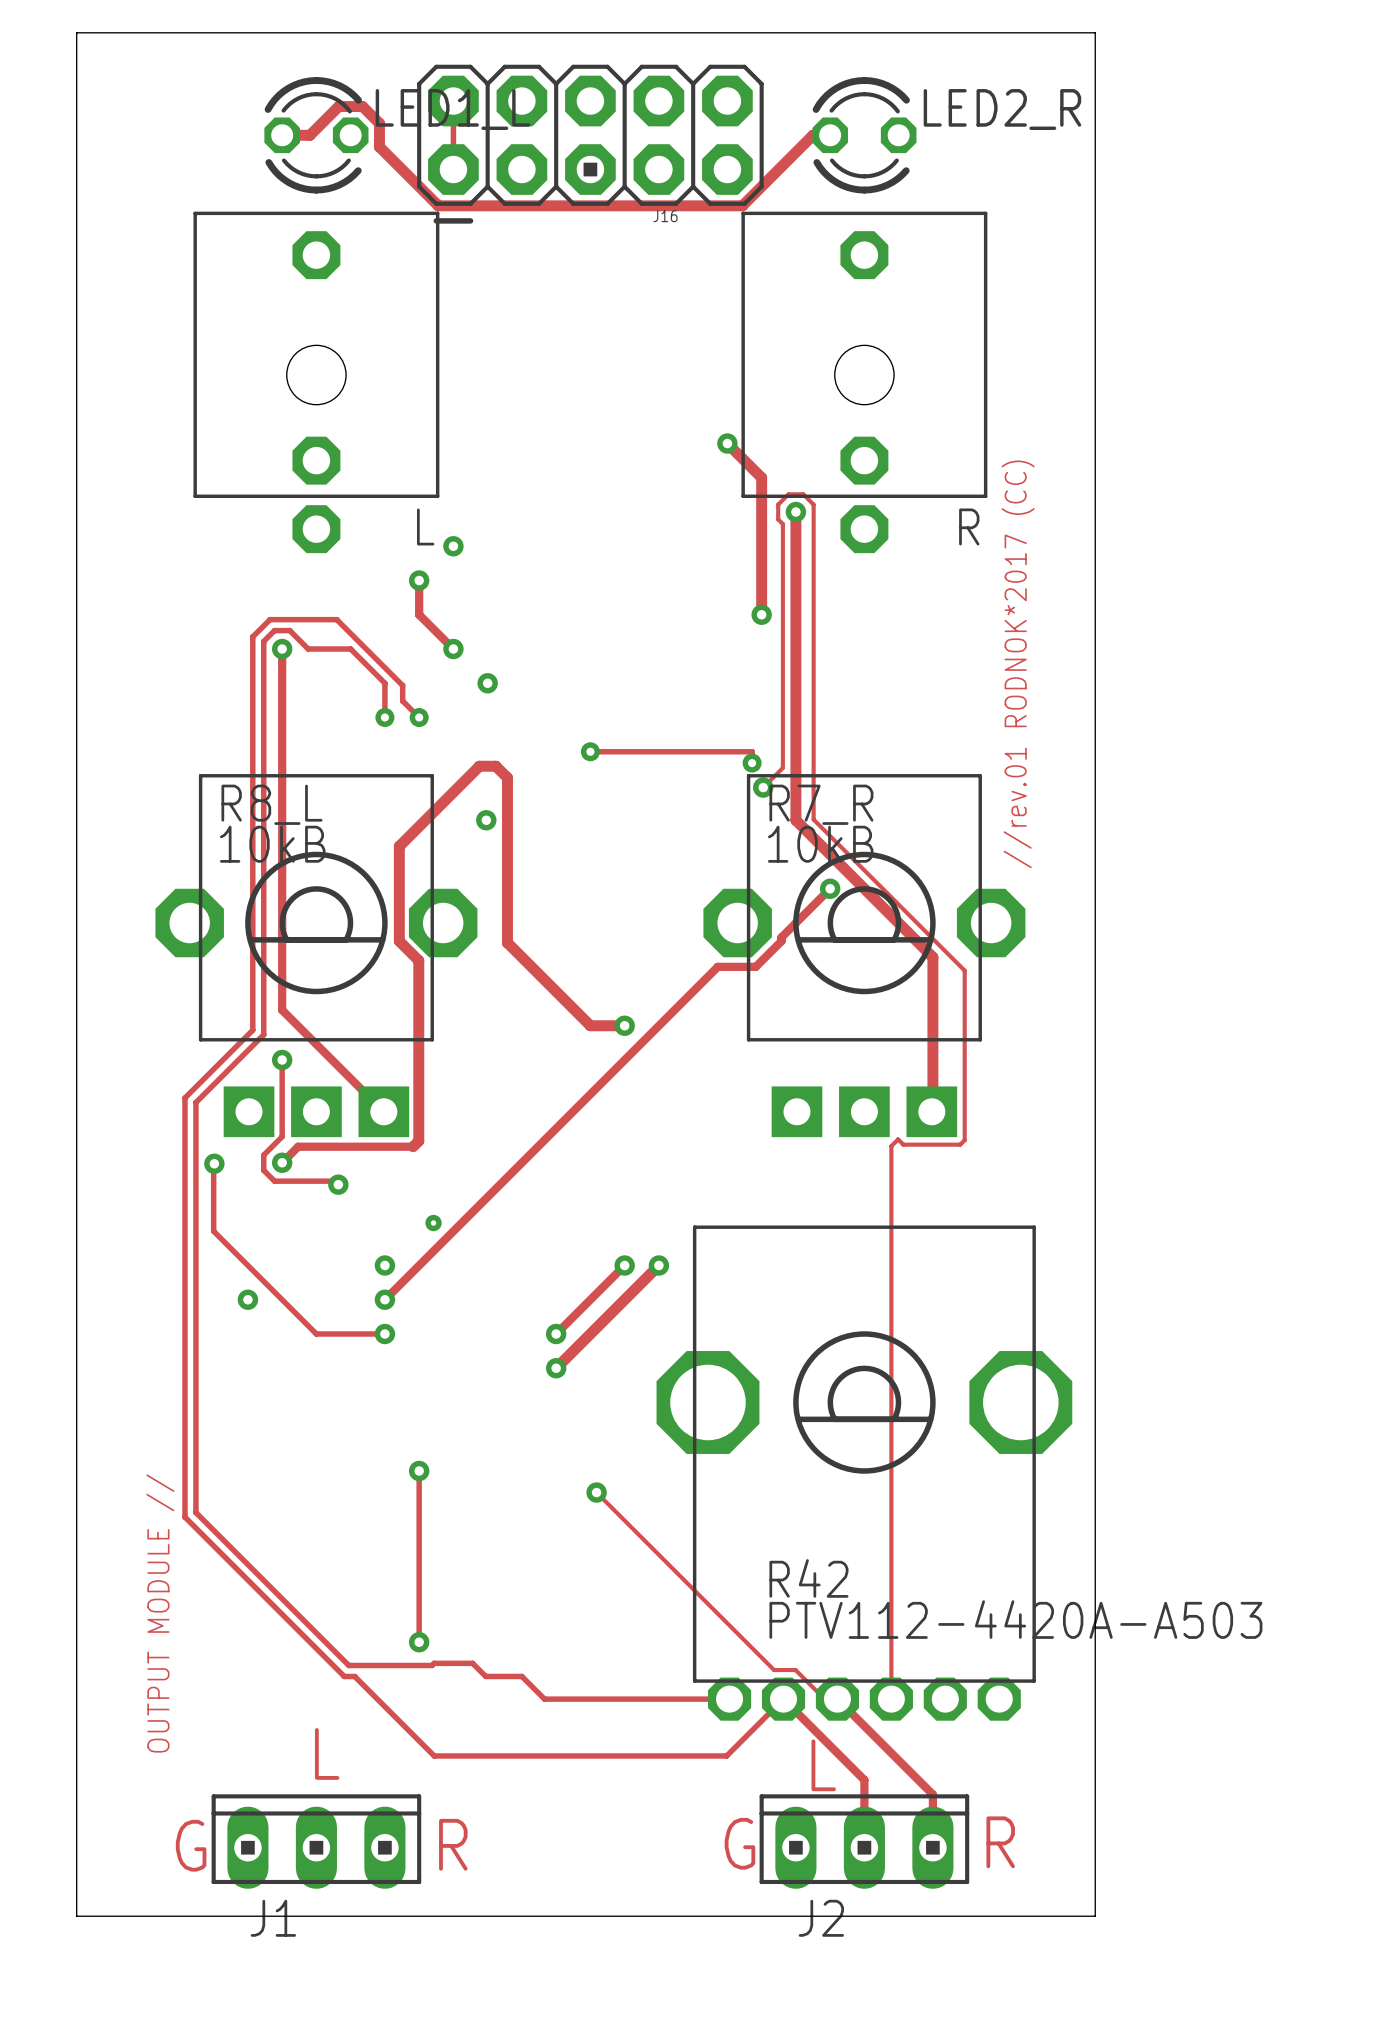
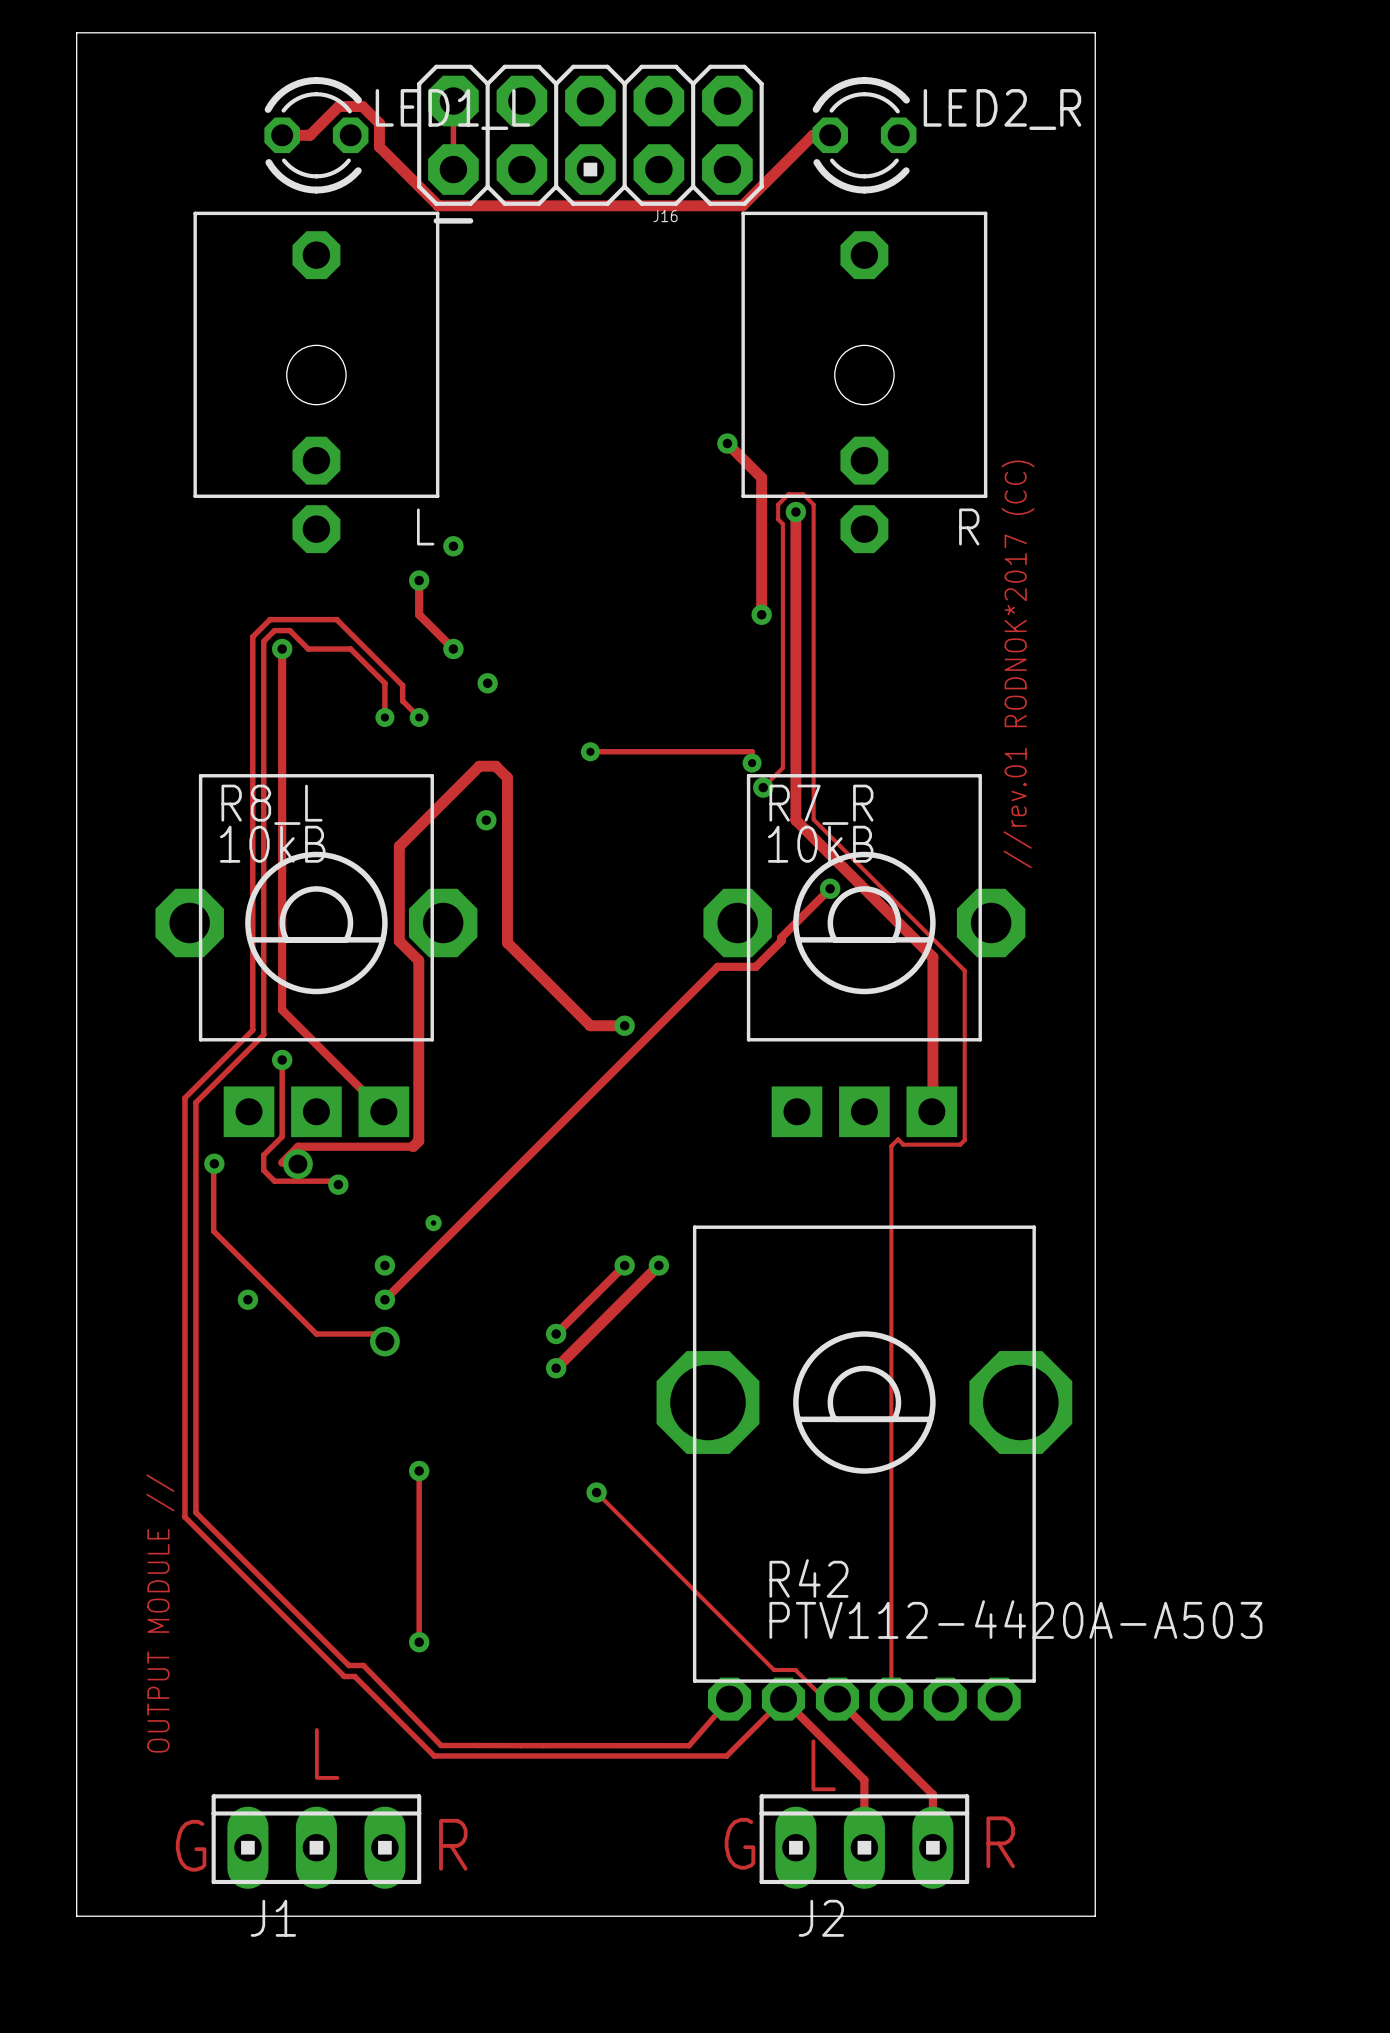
via size: [271, 1152, 293, 1173] -> [283, 1149, 313, 1180]
via size: [374, 1323, 396, 1345] -> [370, 1326, 400, 1357]
track: (363, 1665) (472, 1663) (485, 1676) (521, 1676) (544, 1699) (729, 1699) -> (363, 1665) (441, 1745) (689, 1745) (729, 1699)

